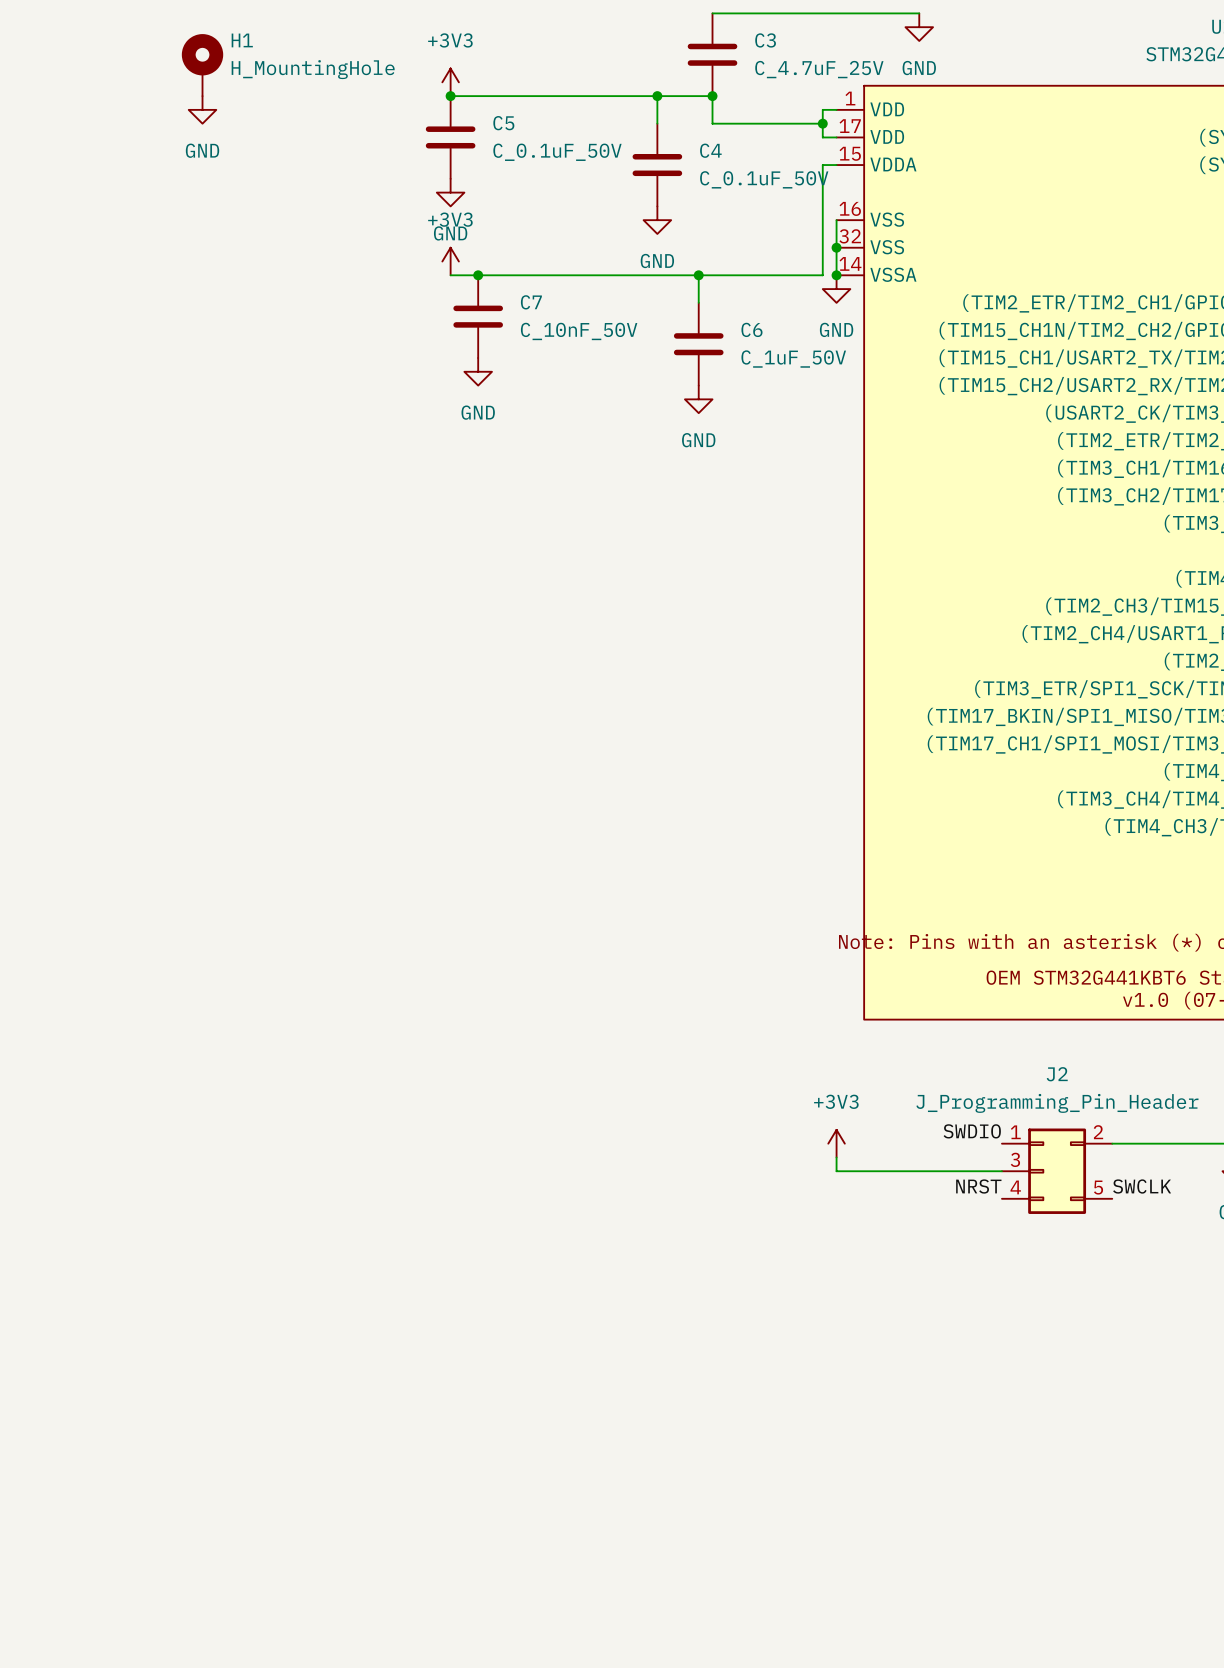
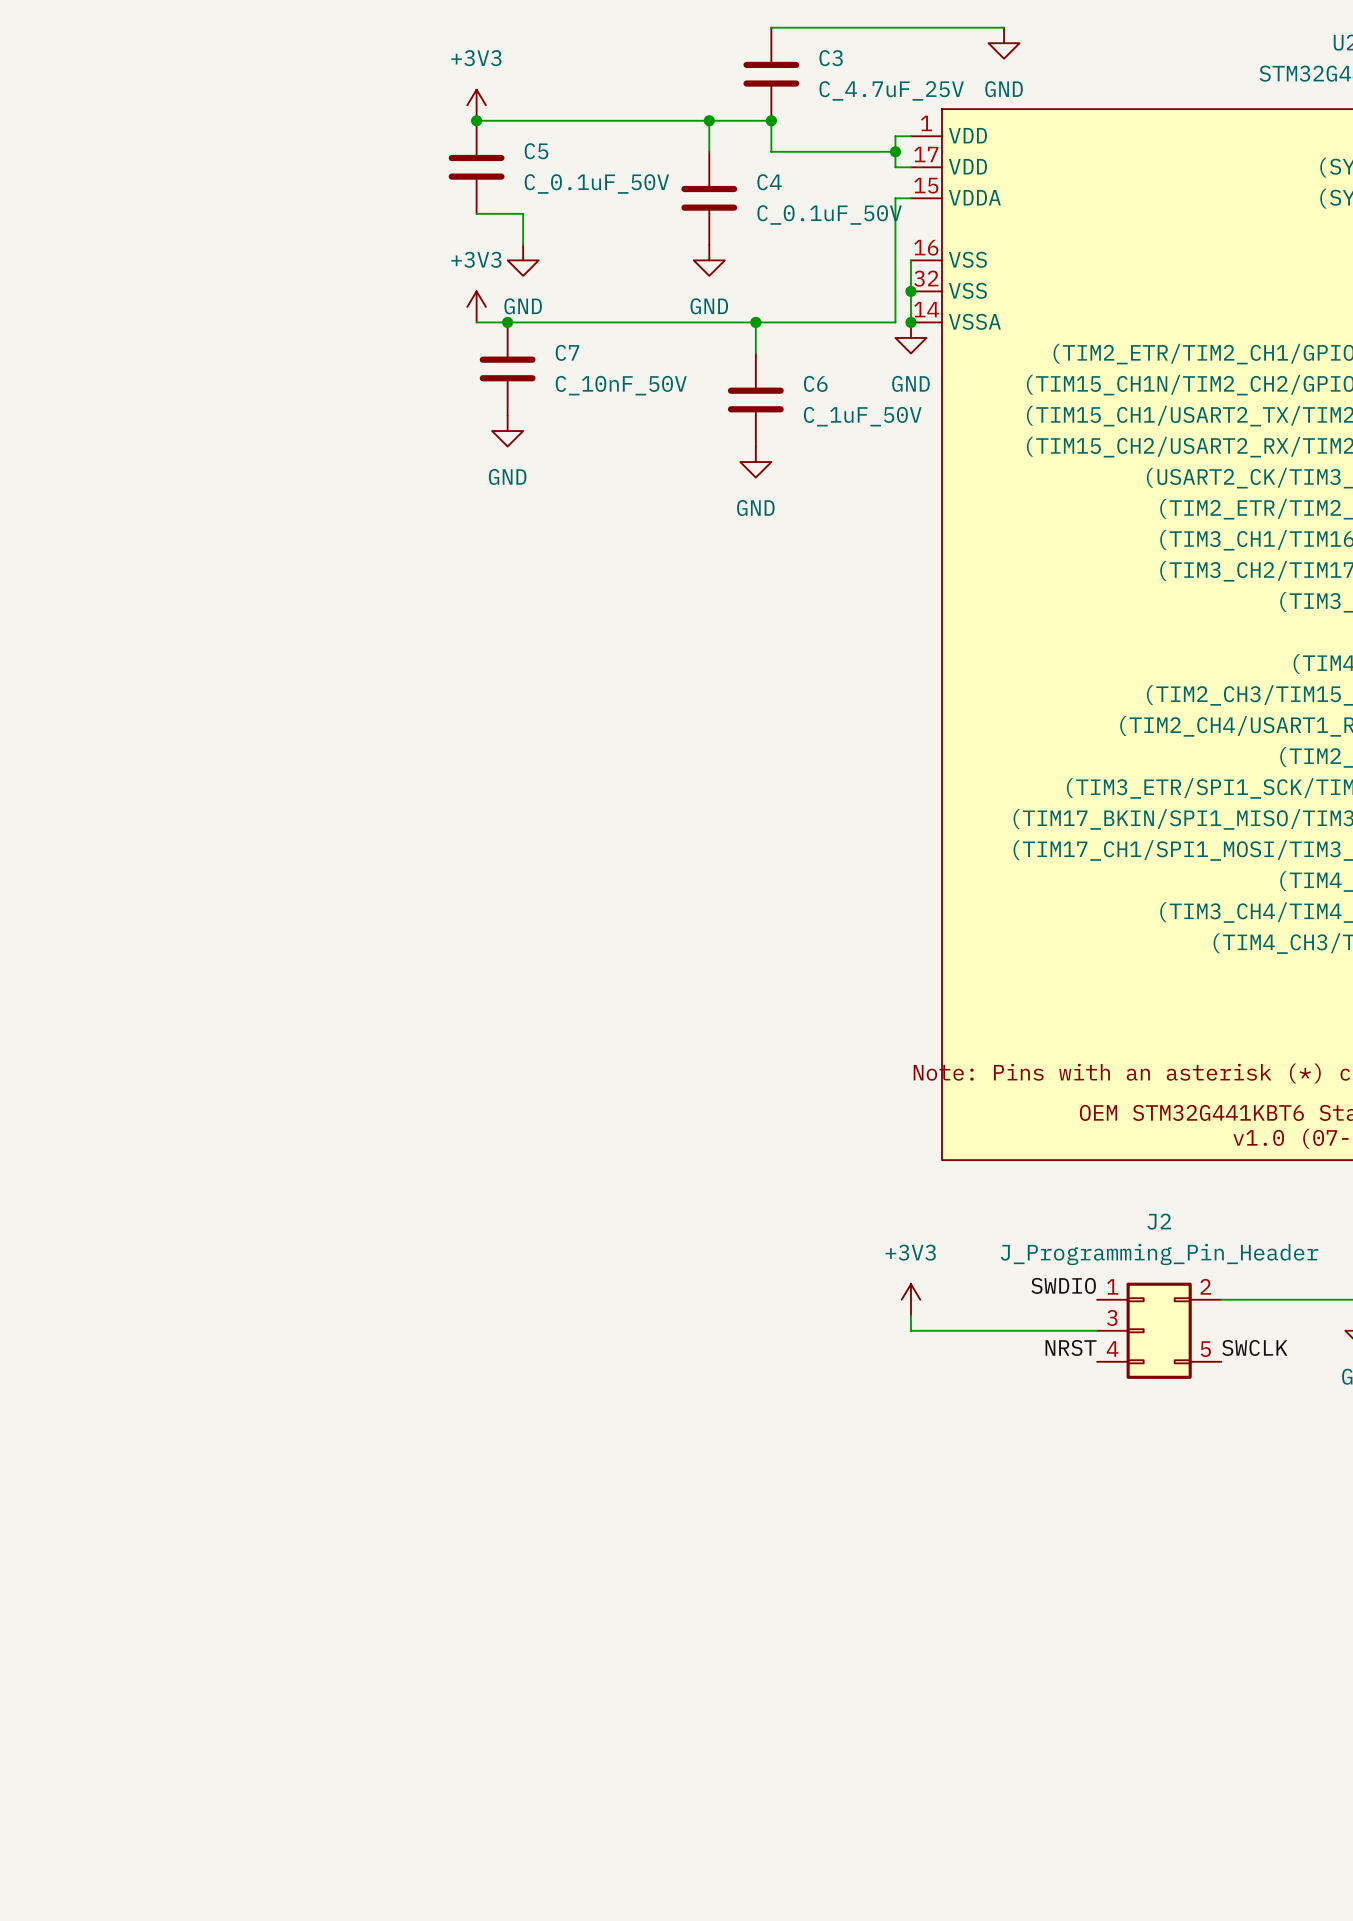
H1: H_MountingHole (202, 65) -> none
power symbol: GND (202, 109) -> none
wire: none -> (476, 213) (523, 213) (523, 244)
power symbol position: GND (450, 192) -> GND (523, 260)

